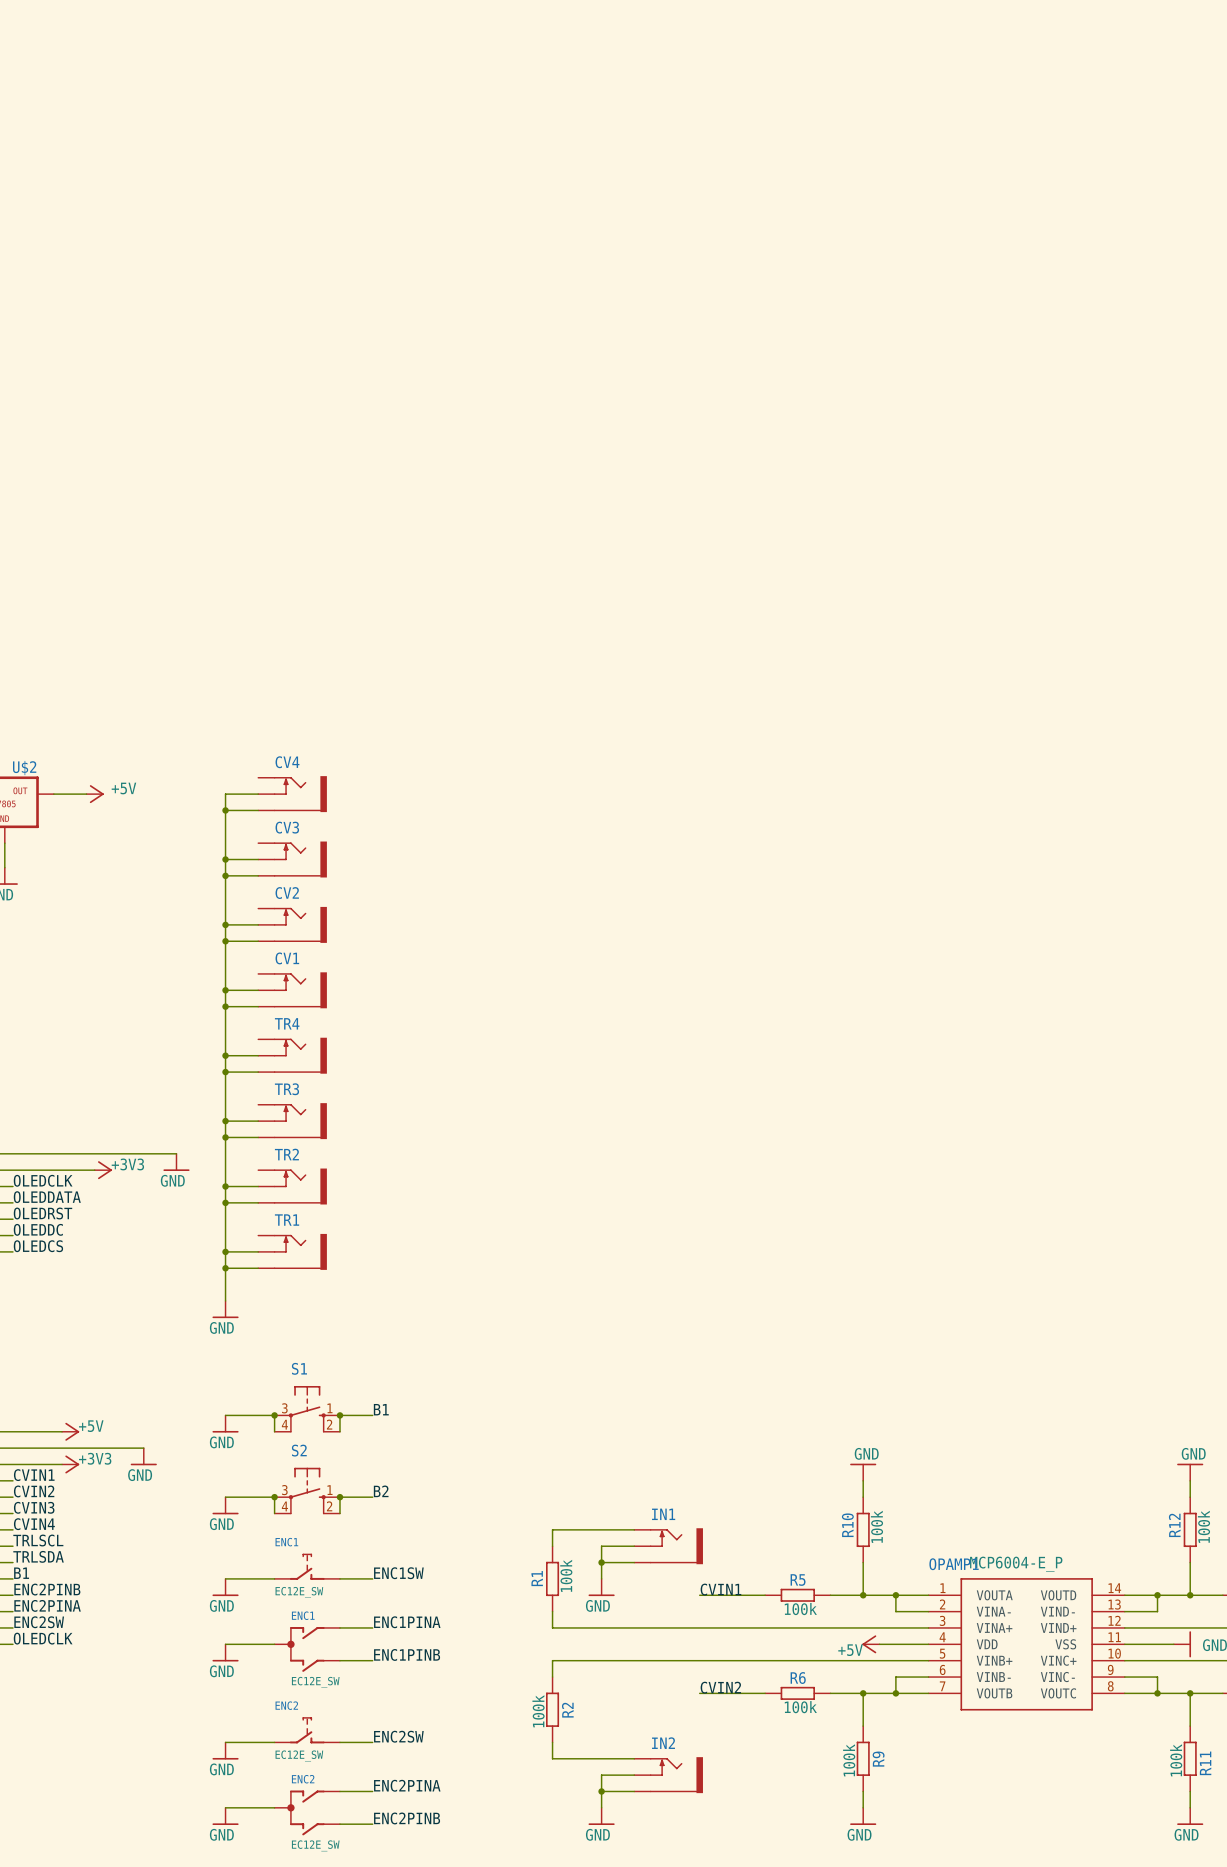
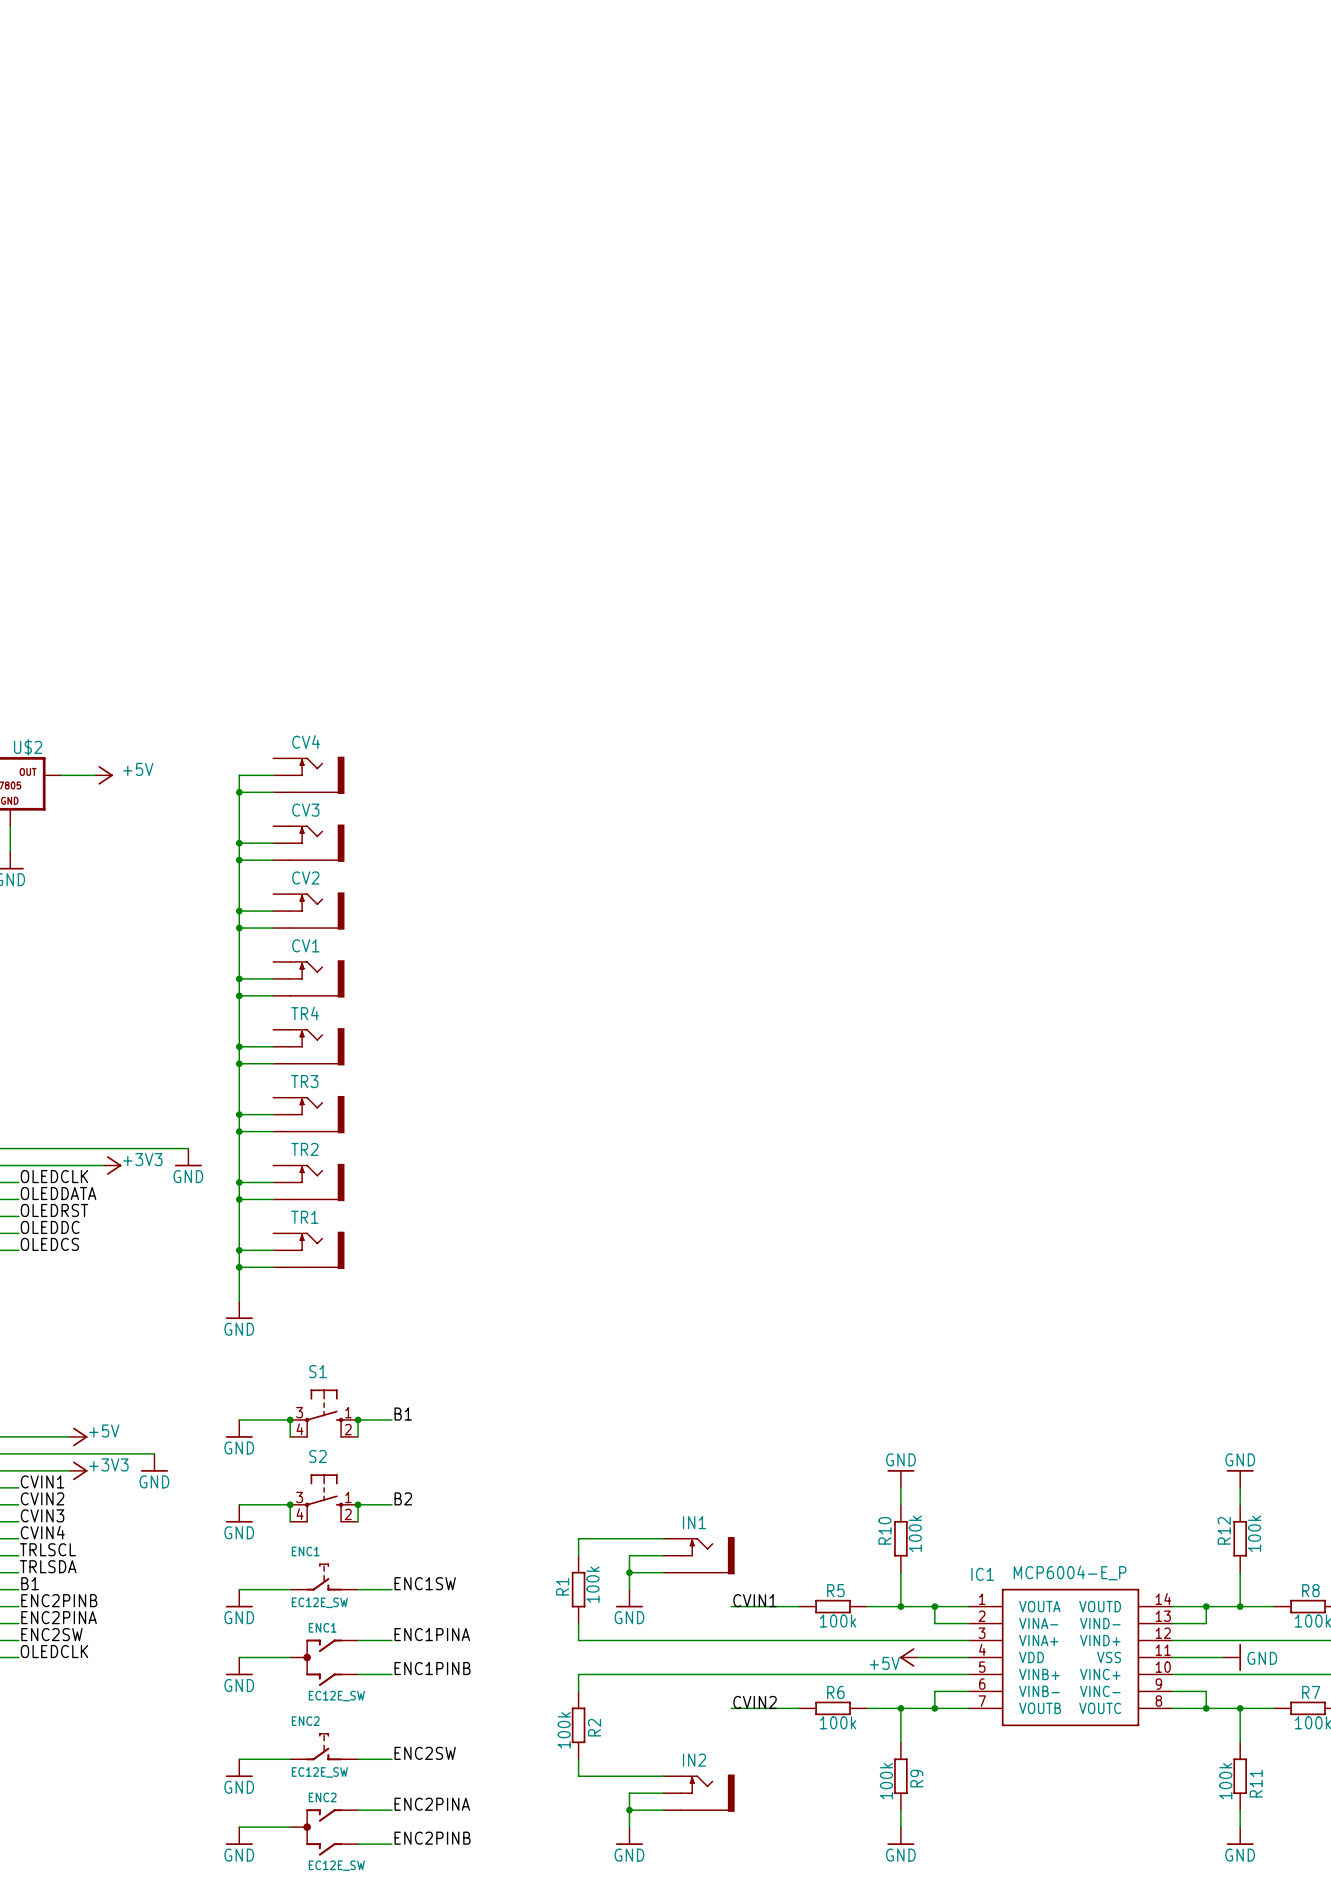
OPAMP1 name: OPAMP1 (954, 1564) -> IC1 (982, 1574)

